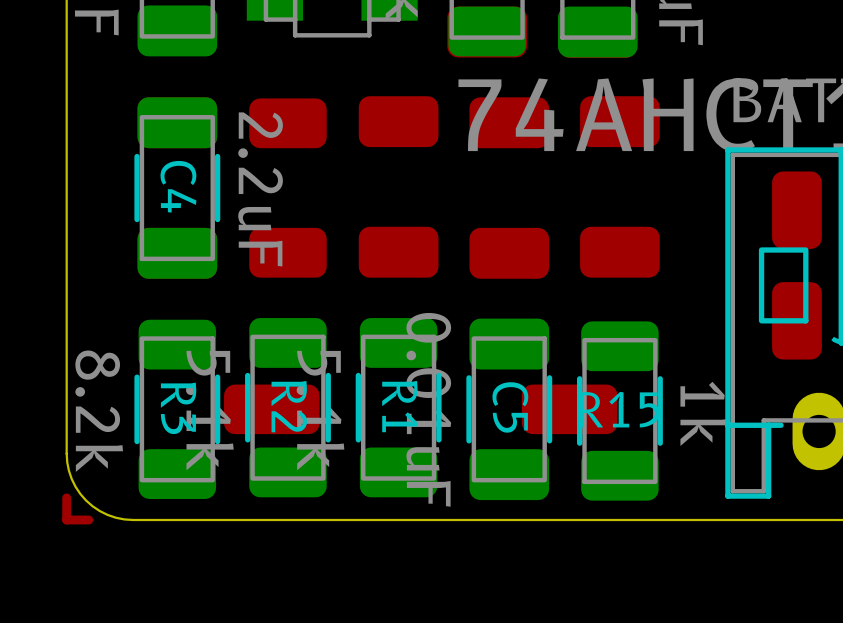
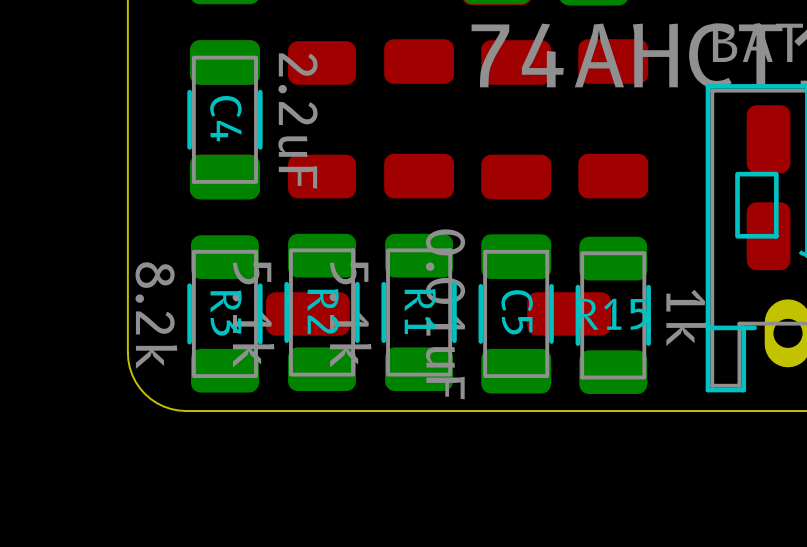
top track: (66, 497) (66, 519) (88, 519) -> none

